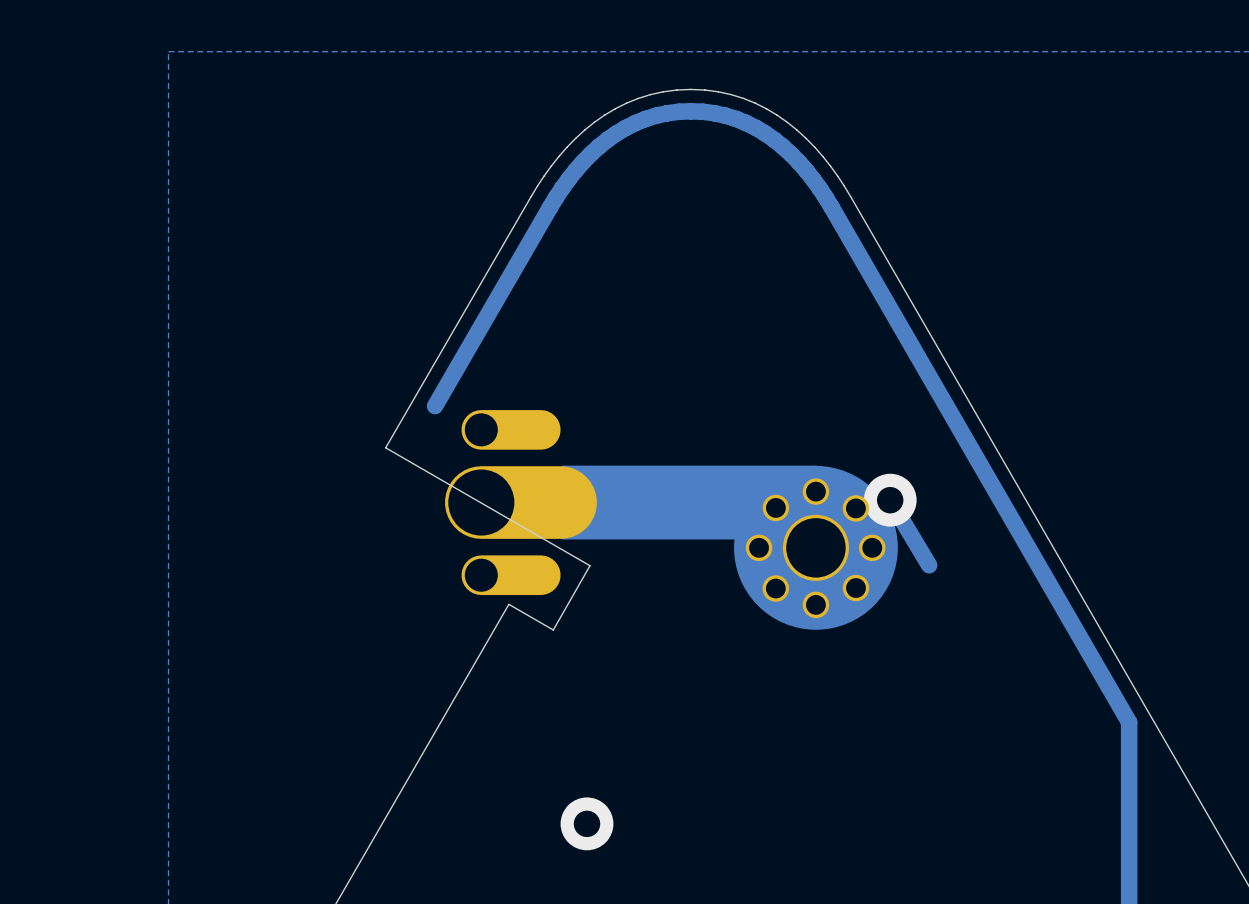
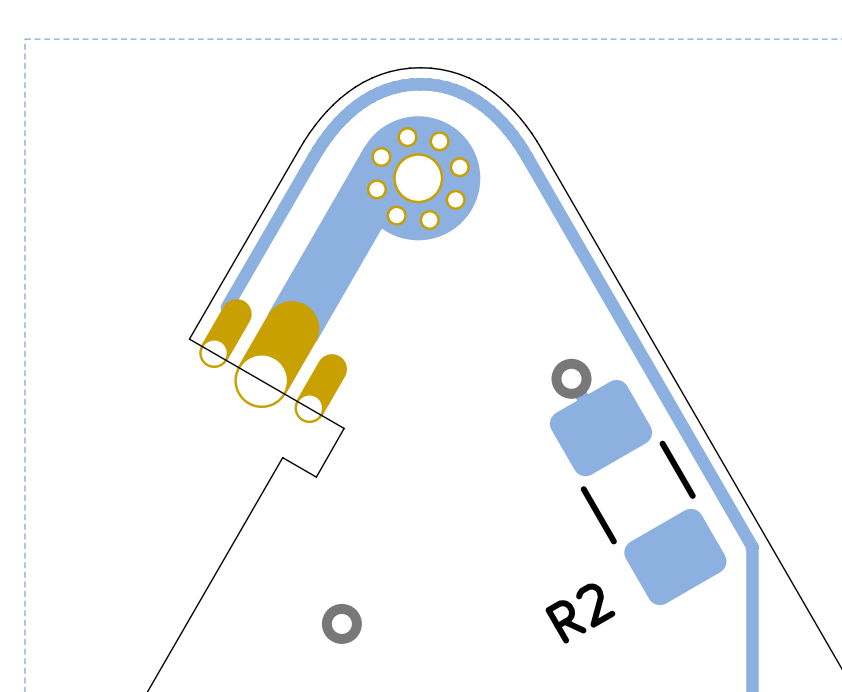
part: none -> (339, 269)
part: (671, 519) -> none
R2: none -> (638, 492)

